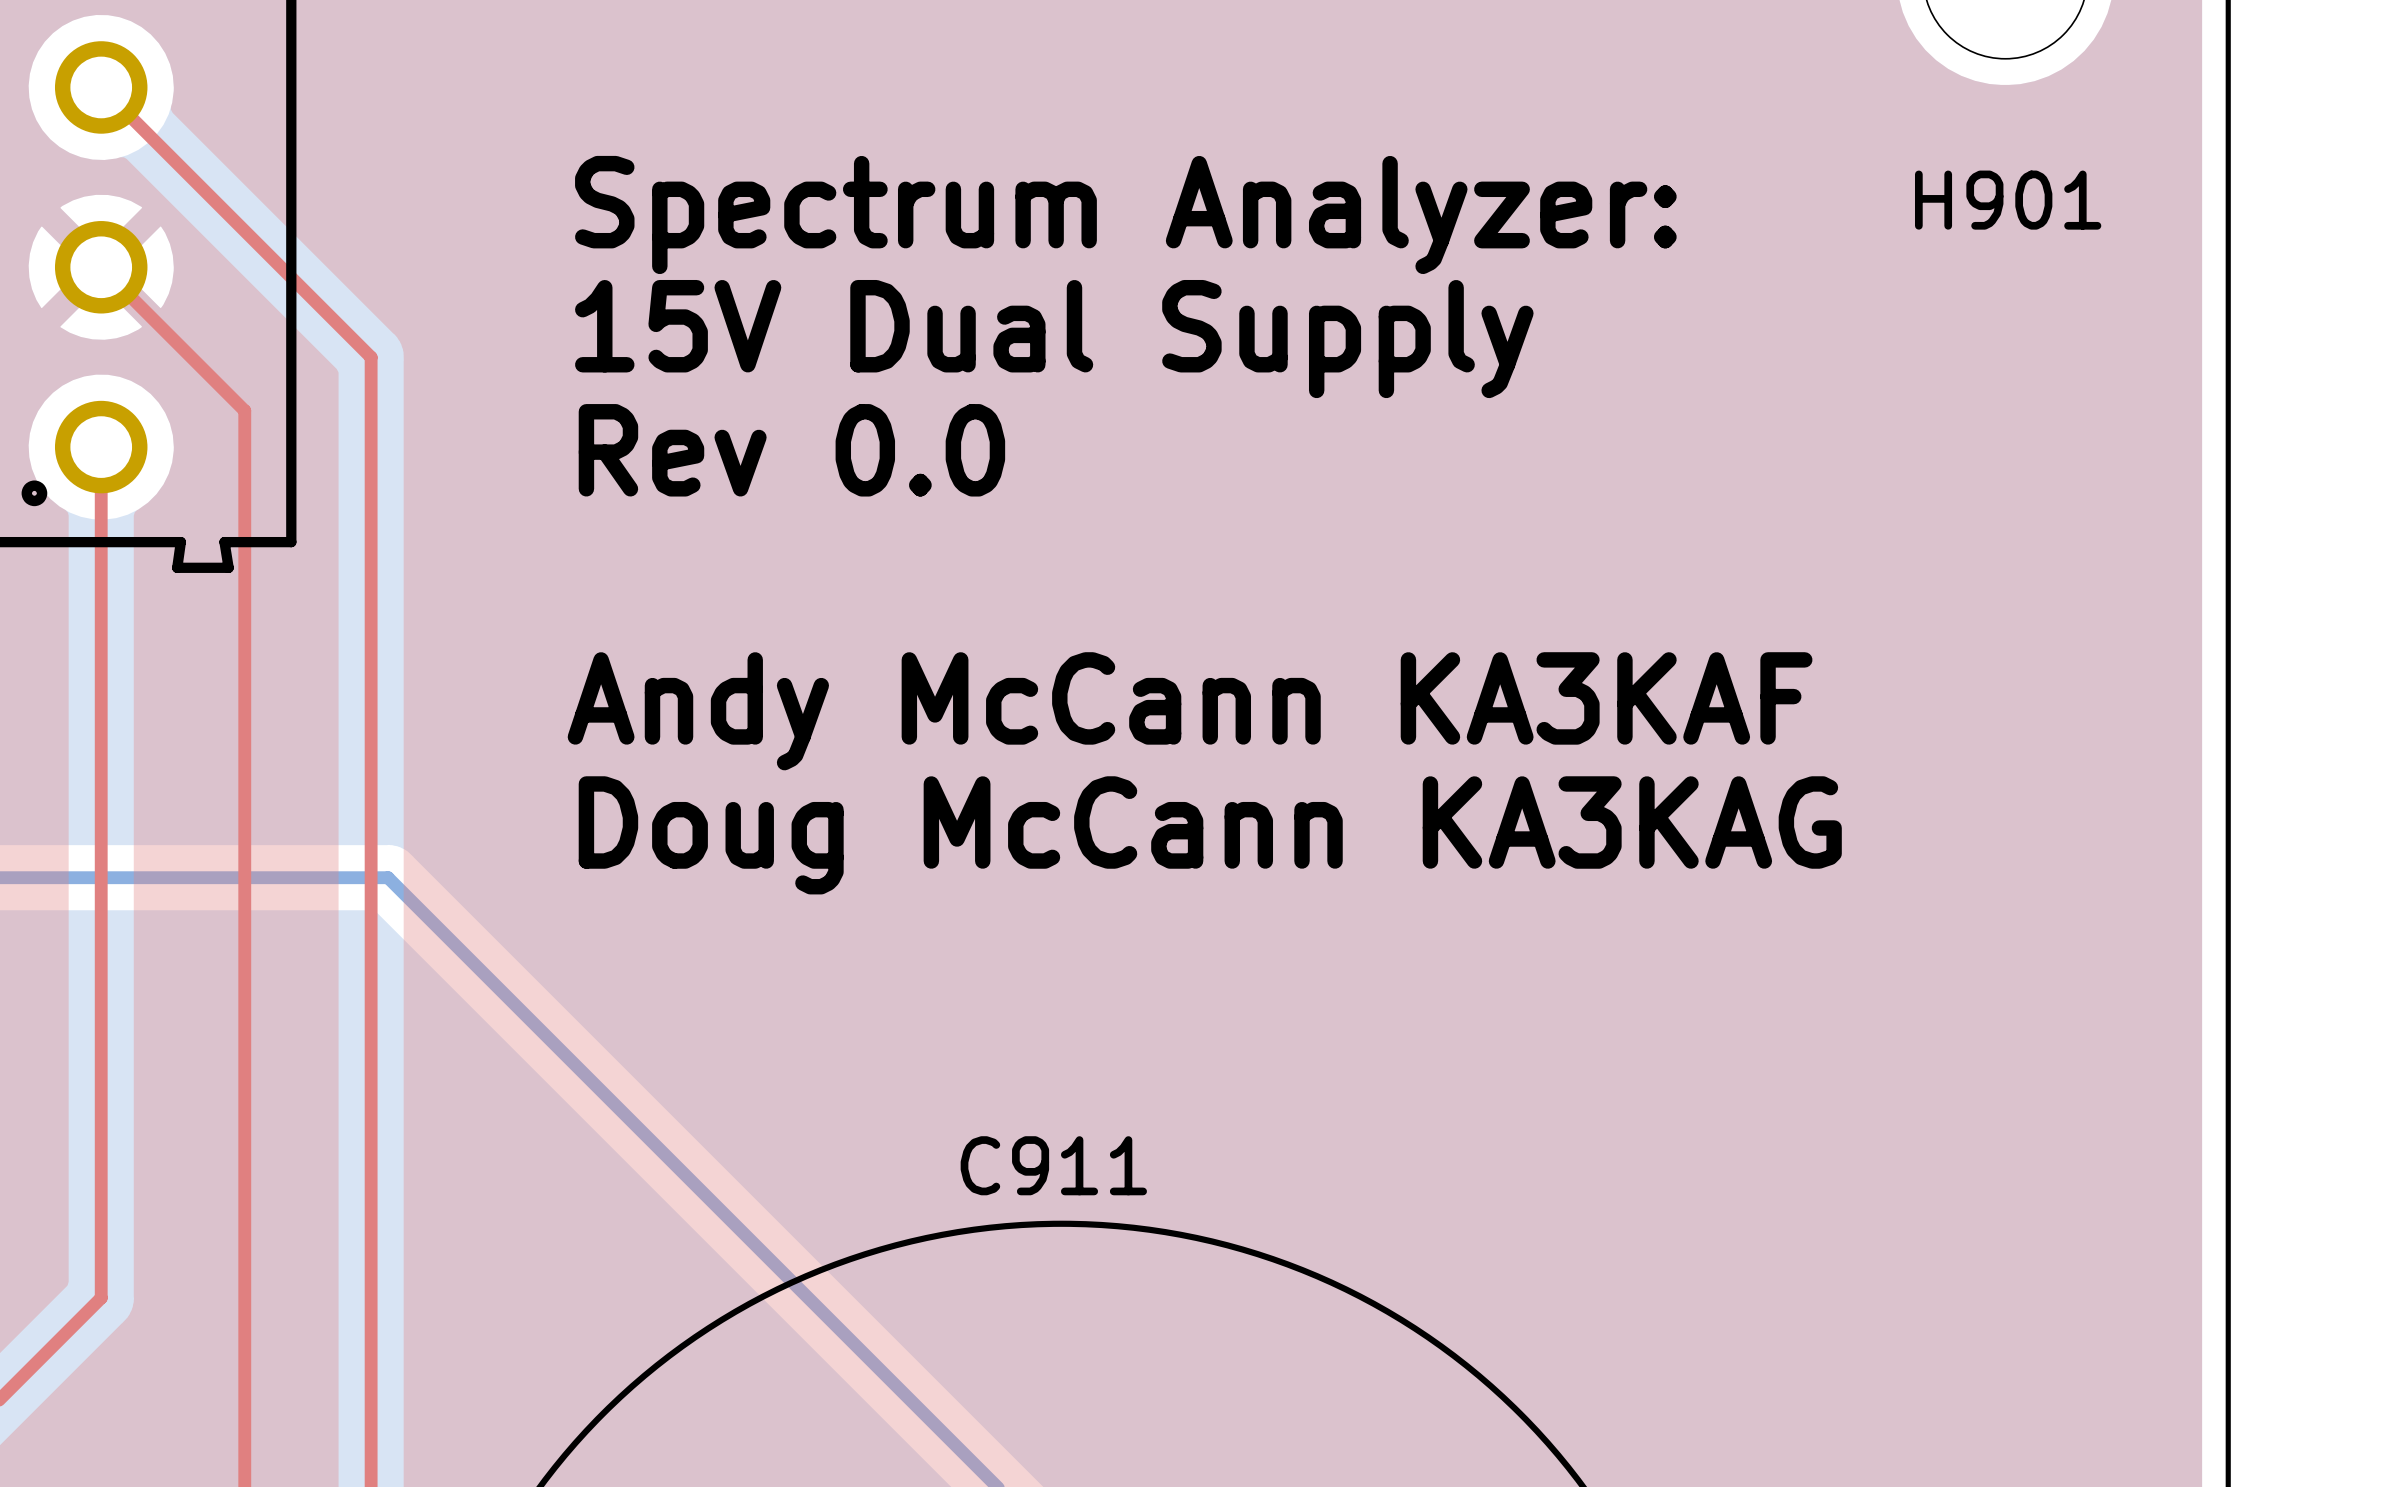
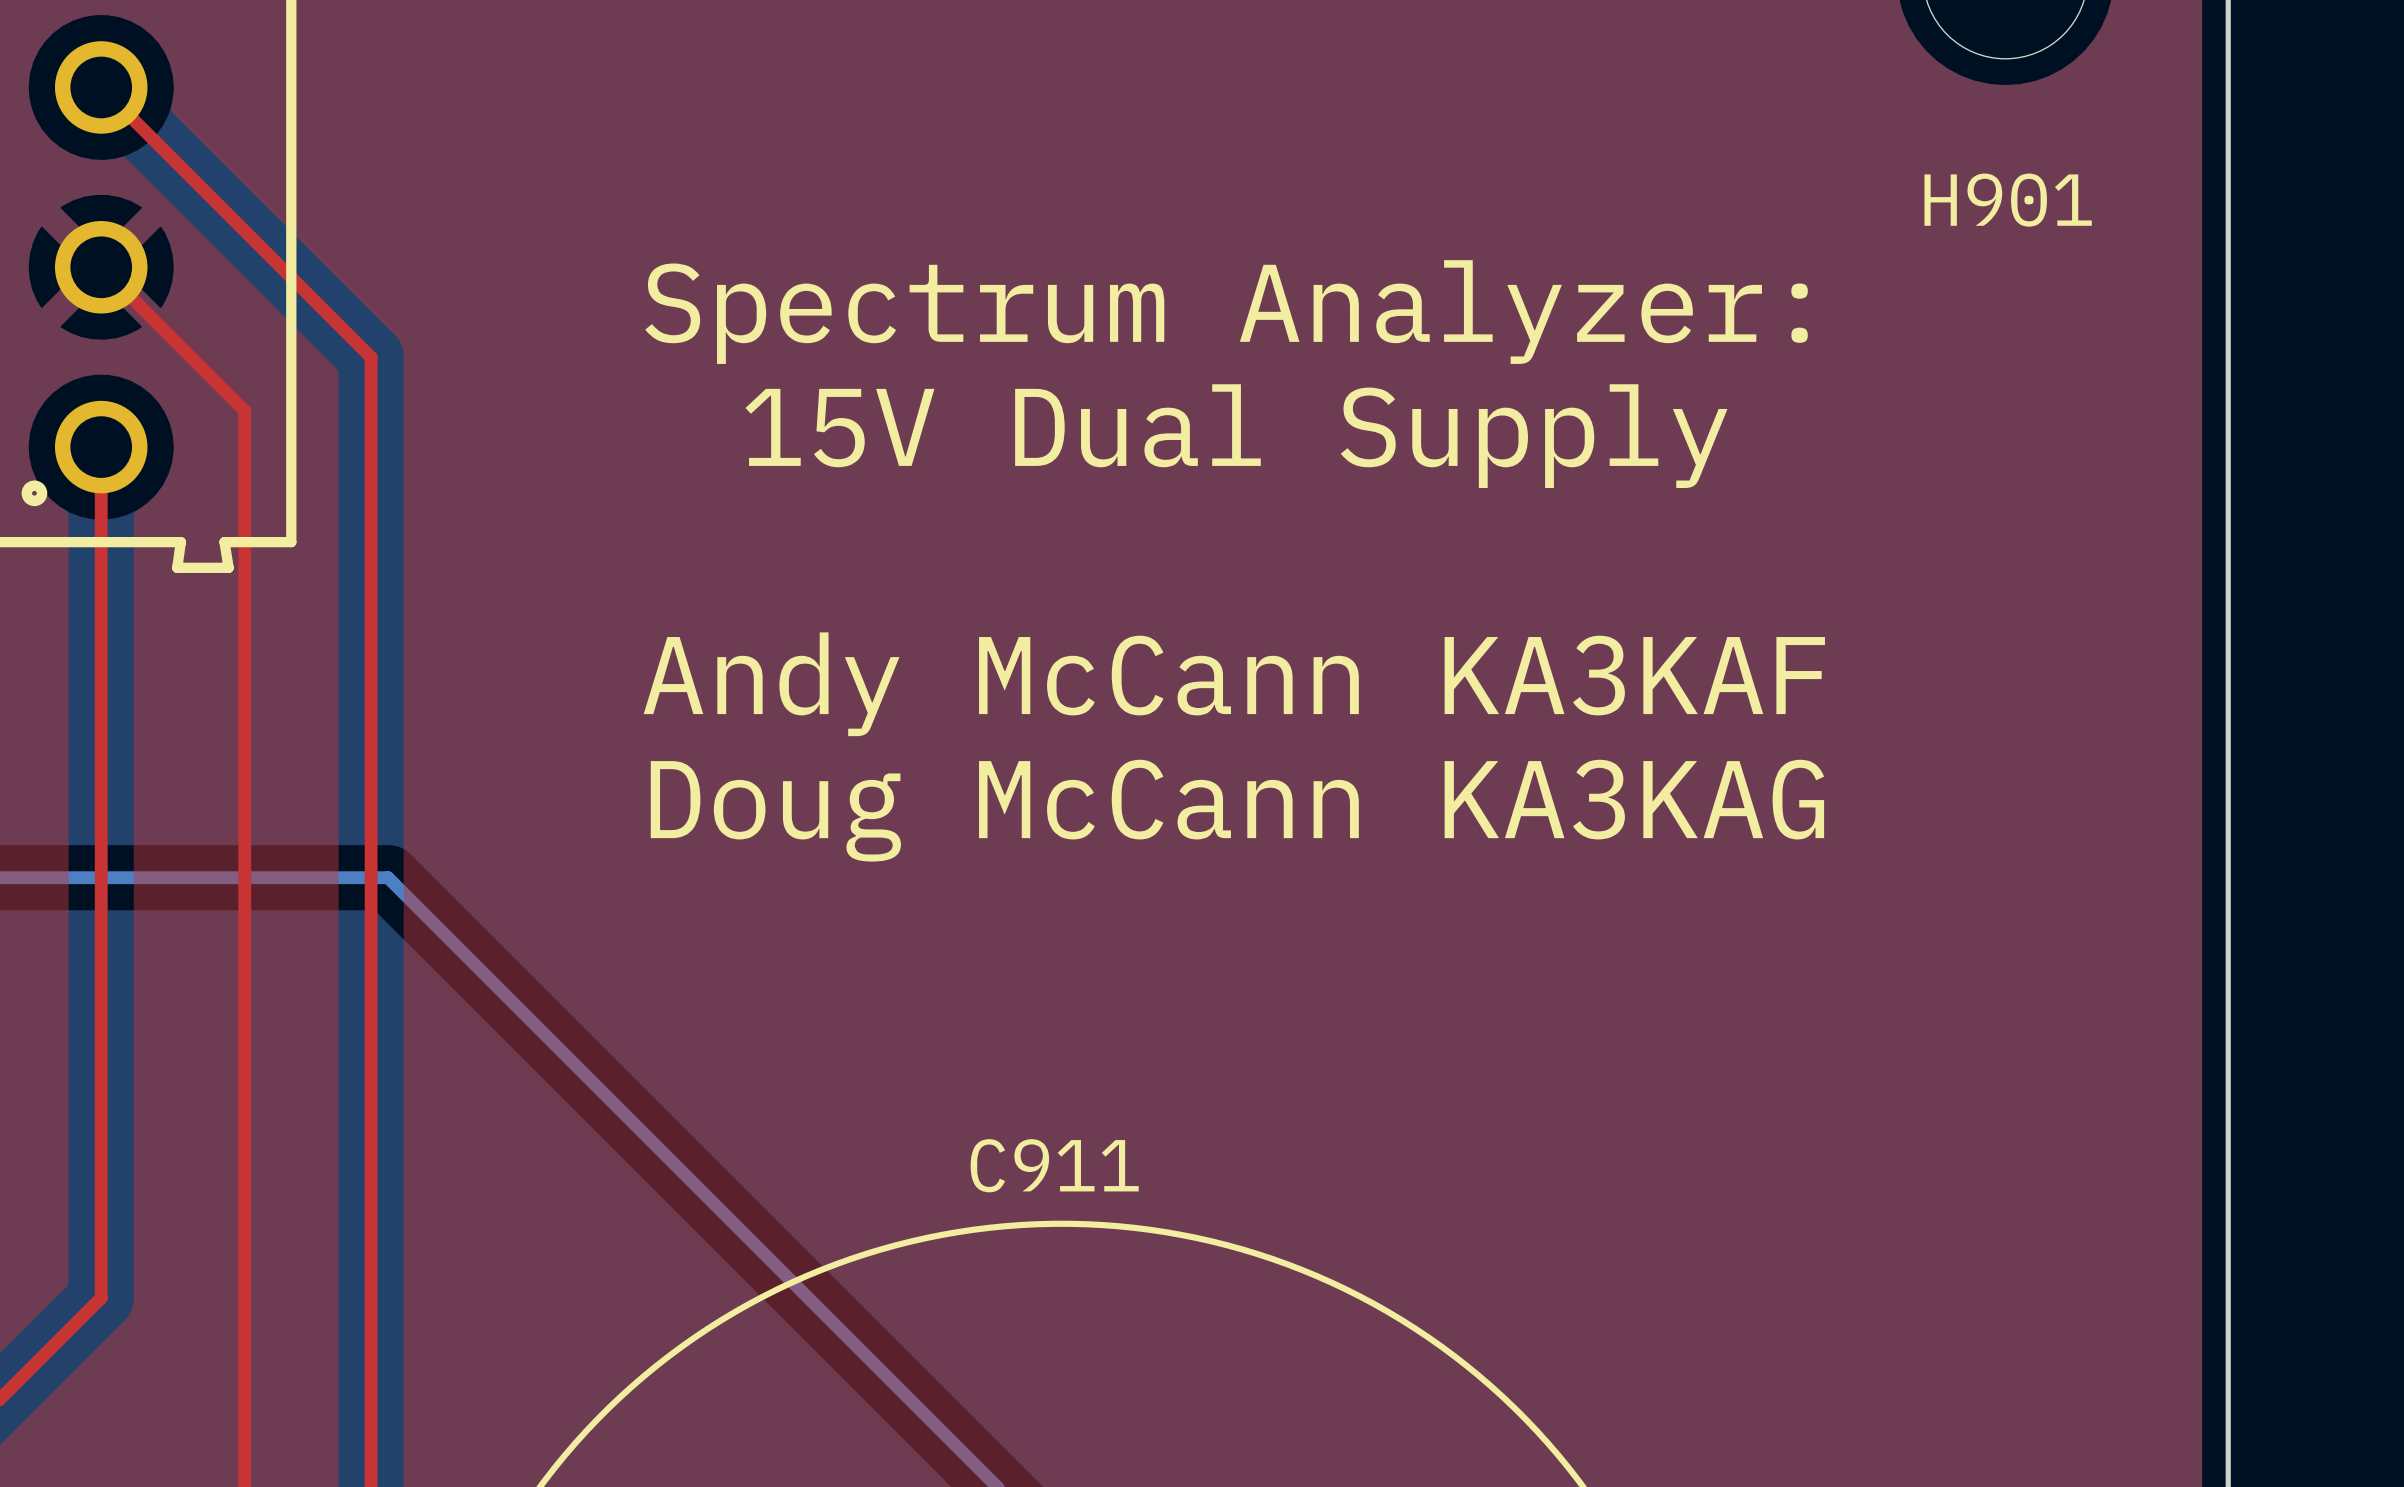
text position: Spectrum Analyzer: (1125, 214) -> Spectrum Analyzer: (1226, 312)
text position: 15V Dual Supply (1054, 339) -> 15V Dual Supply (1236, 436)
text: Rev 0.0 (791, 450) -> none
text position: Andy McCann KA3KAF (1190, 711) -> Andy McCann KA3KAF (1234, 684)
text position: Doug McCann KA3KAG (1210, 835) -> Doug McCann KA3KAG (1237, 810)

